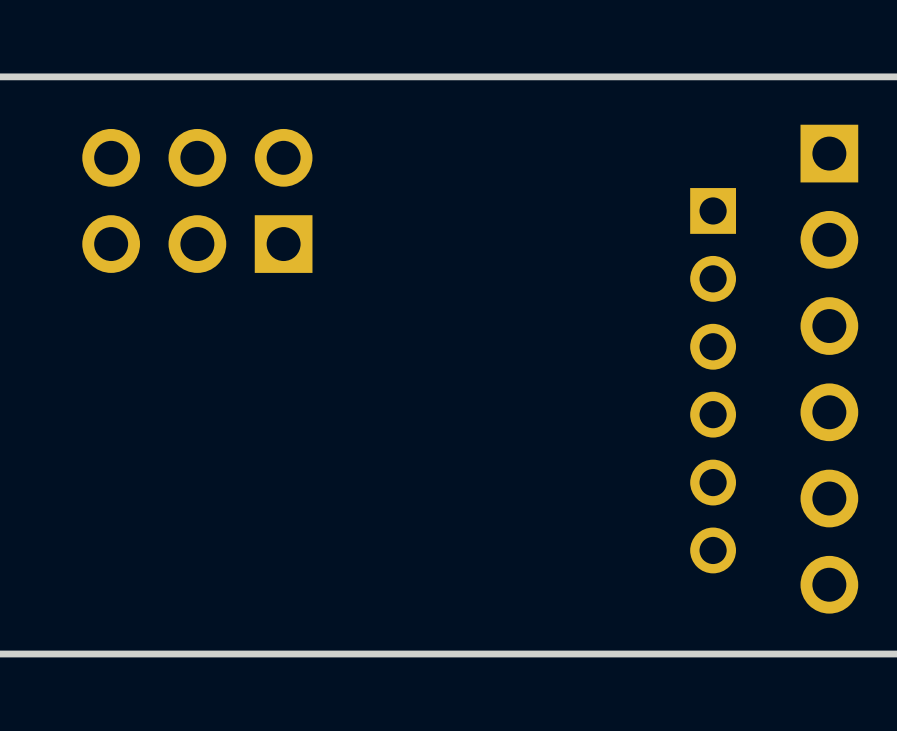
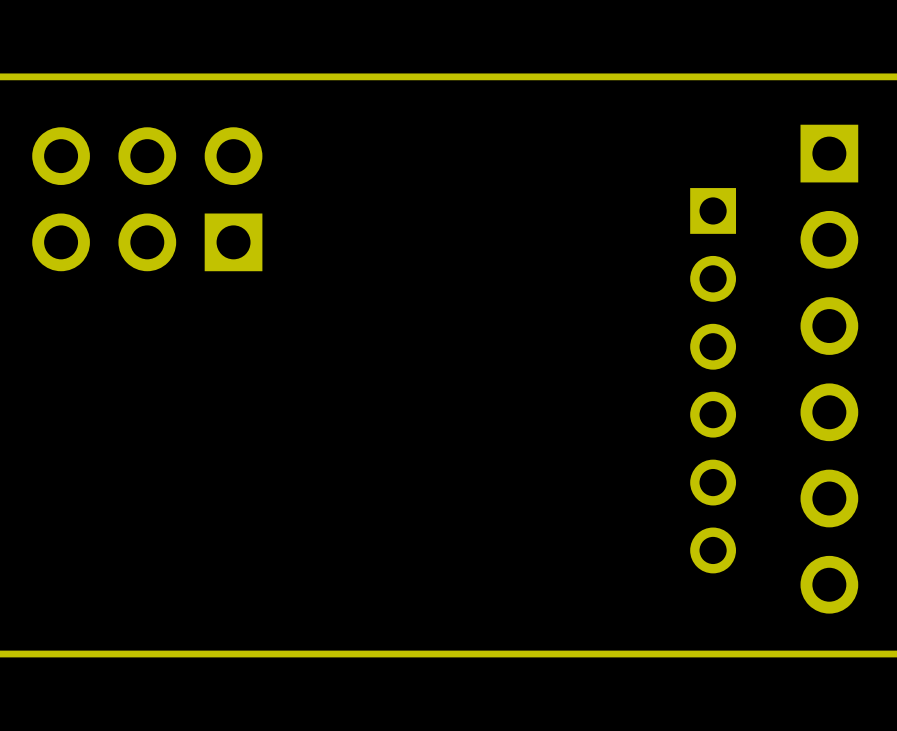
part position: (197, 200) -> (147, 199)

